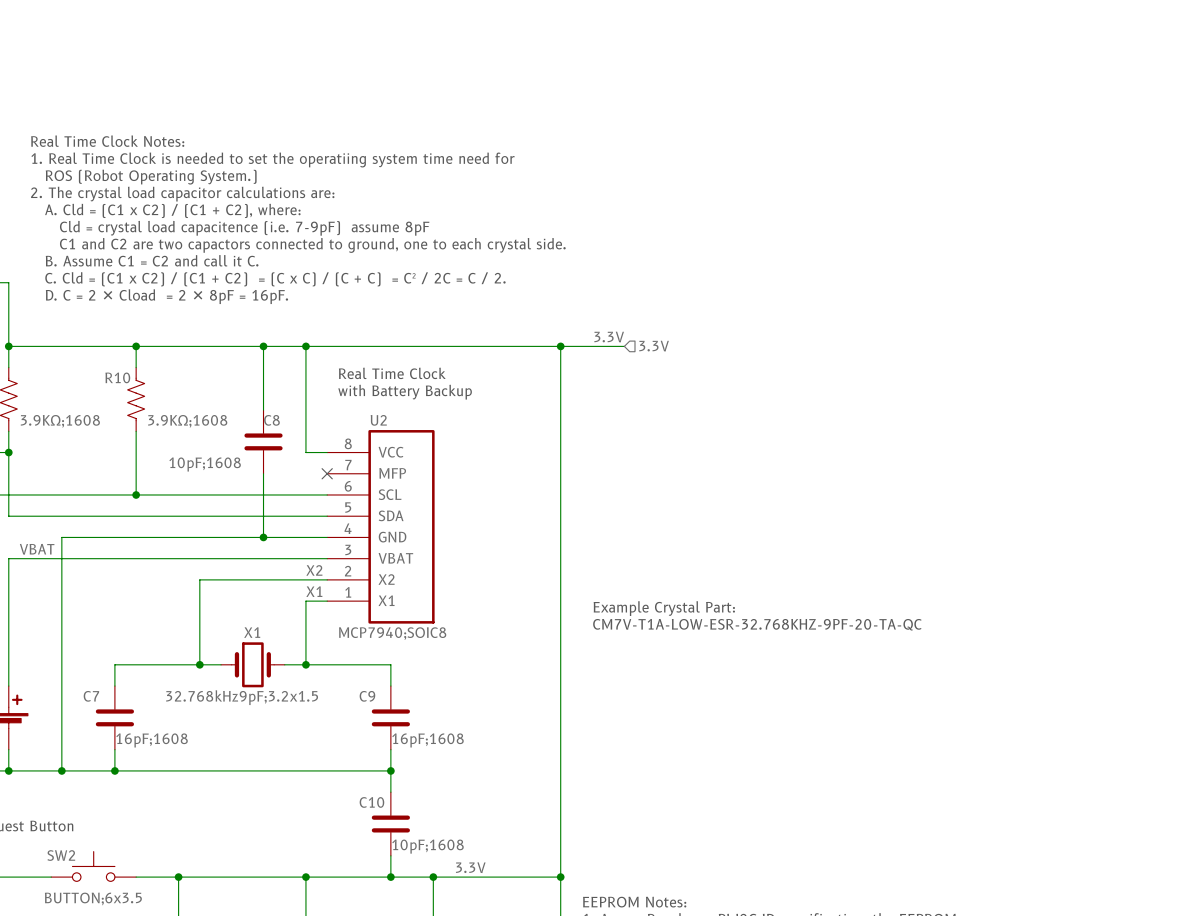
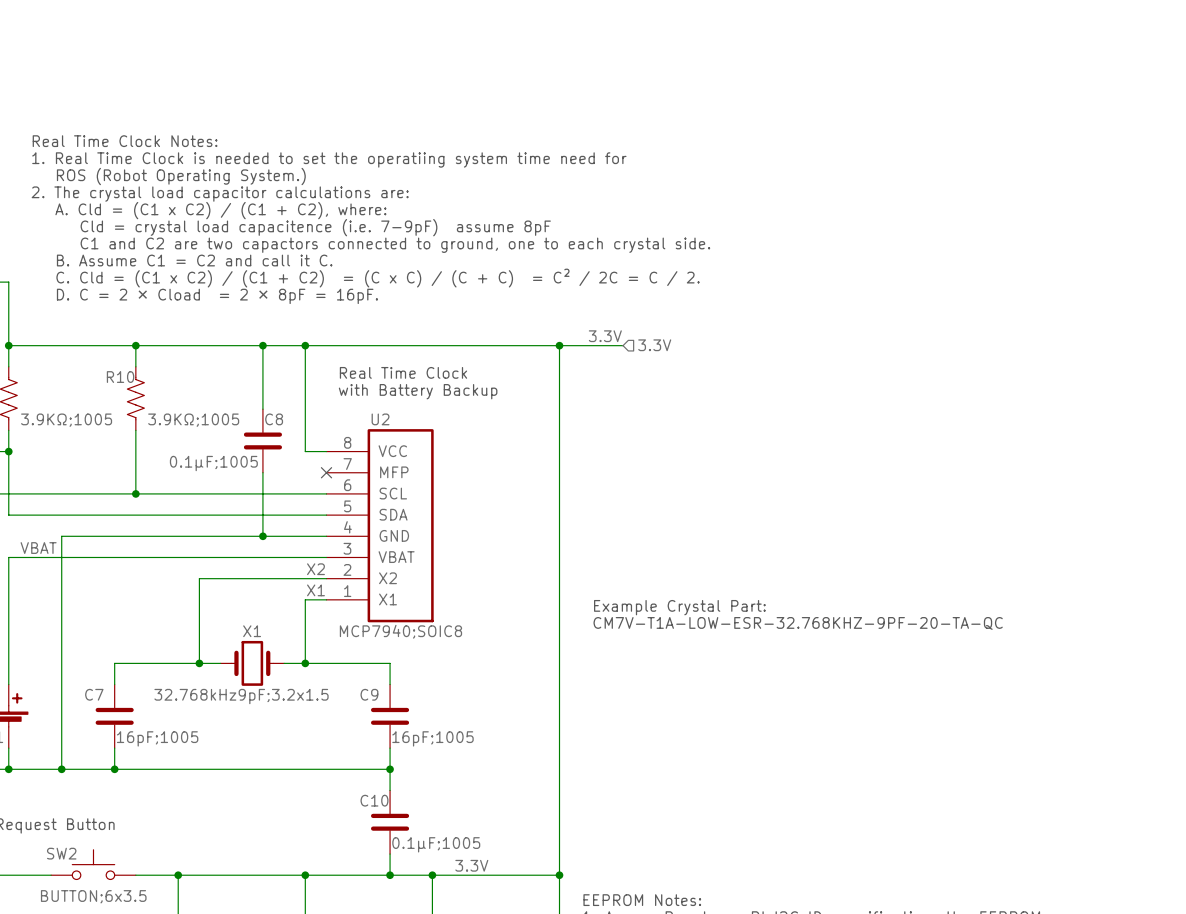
part value: 3.9KΩ;1608 (60, 421) -> 3.9KΩ;1005 (66, 420)
R10 value: 3.9KΩ;1608 (187, 421) -> 3.9KΩ;1005 (193, 420)
C8 value: 10pF;1608 (205, 464) -> 0.1µF;1005 (213, 463)
C7 value: 16pF;1608 (152, 740) -> 16pF;1005 (157, 738)
C9 value: 16pF;1608 (427, 740) -> 16pF;1005 (432, 738)
C10 value: 10pF;1608 (427, 846) -> 0.1µF;1005 (436, 844)

